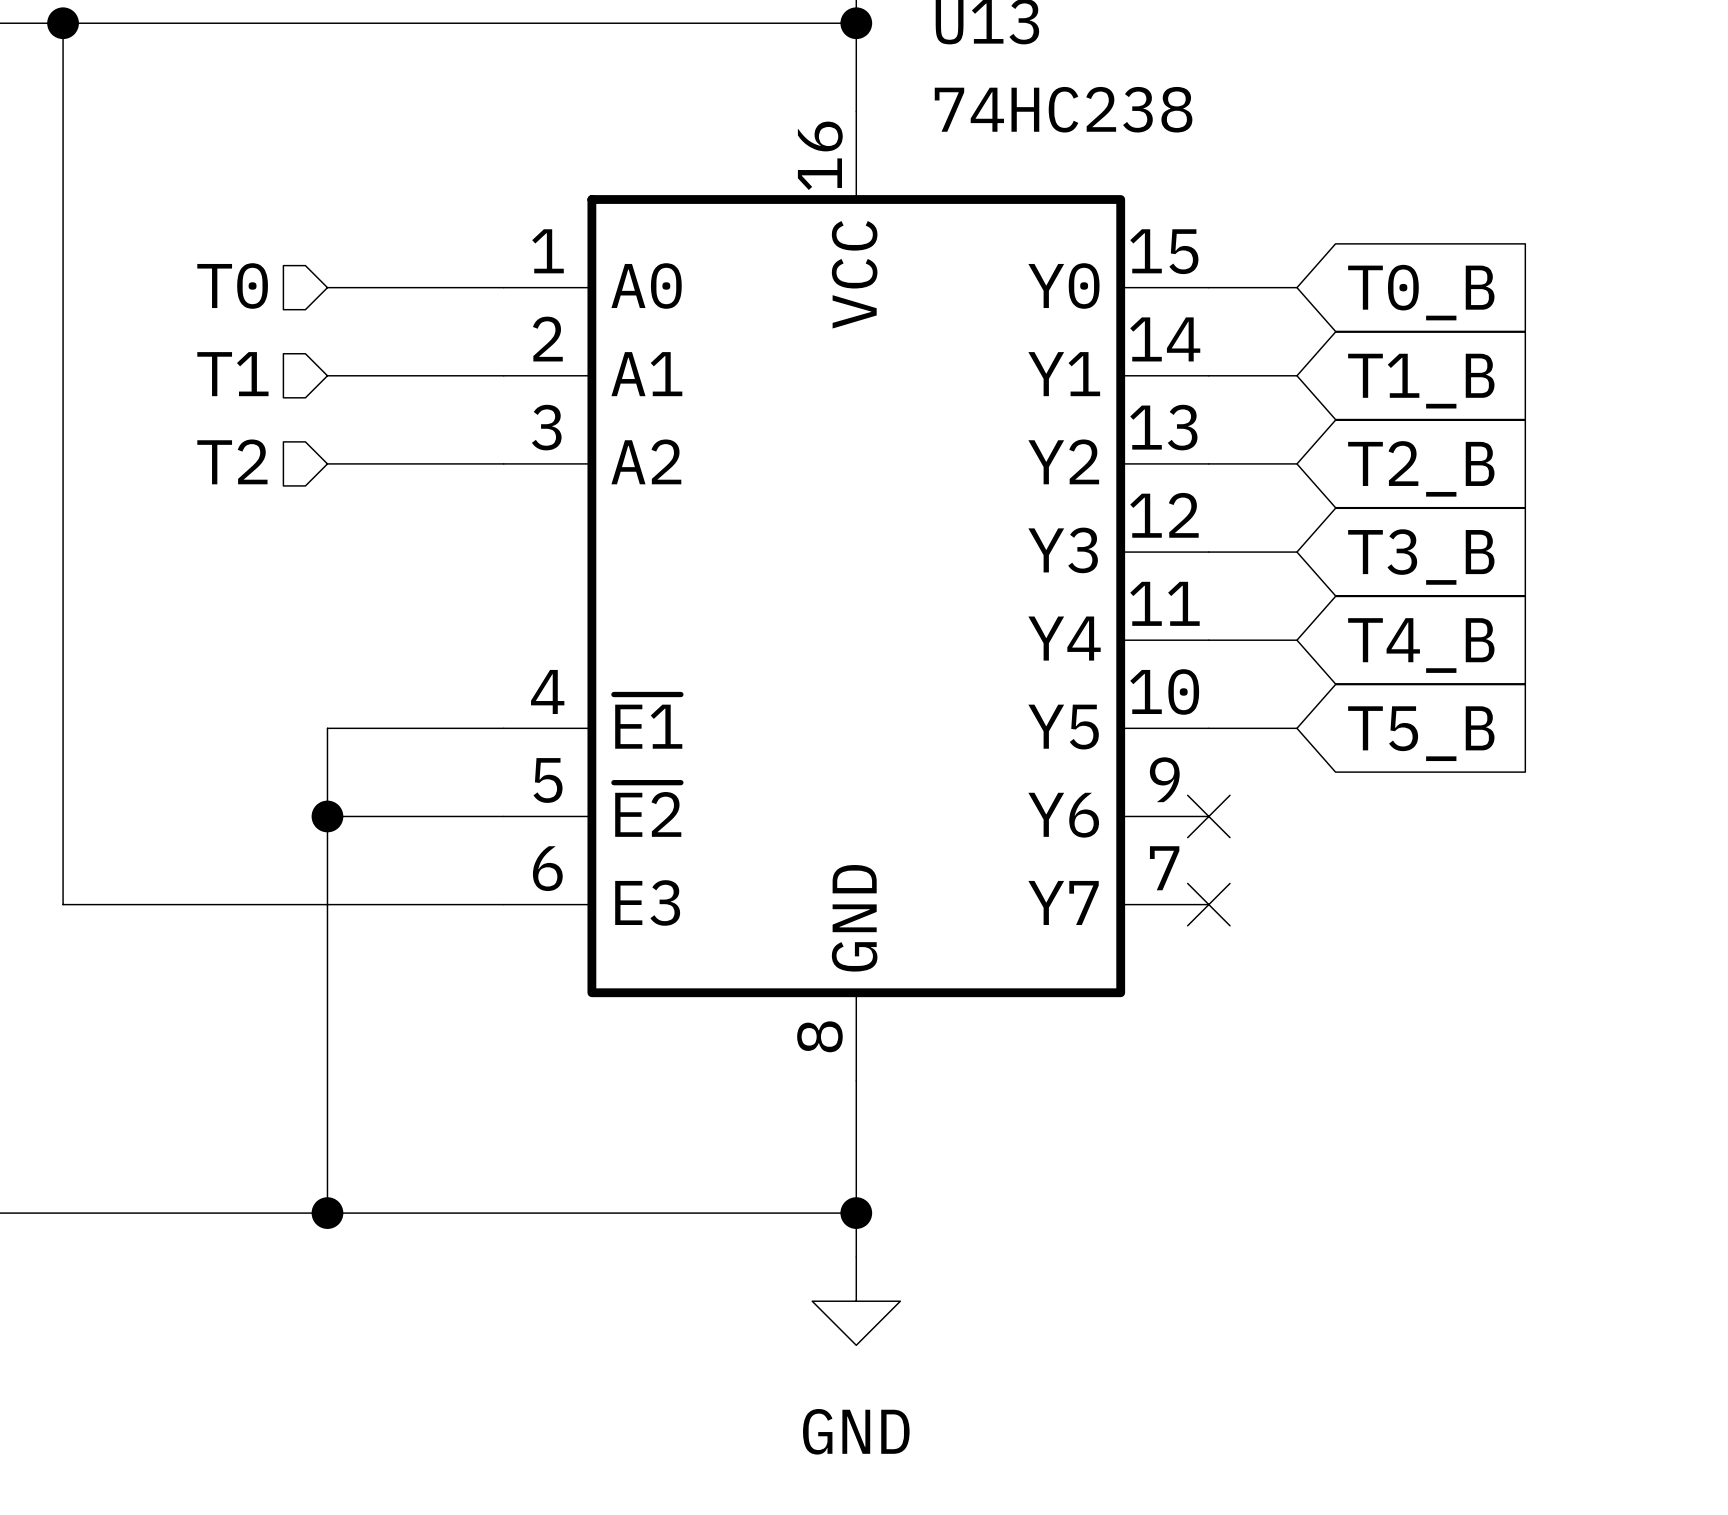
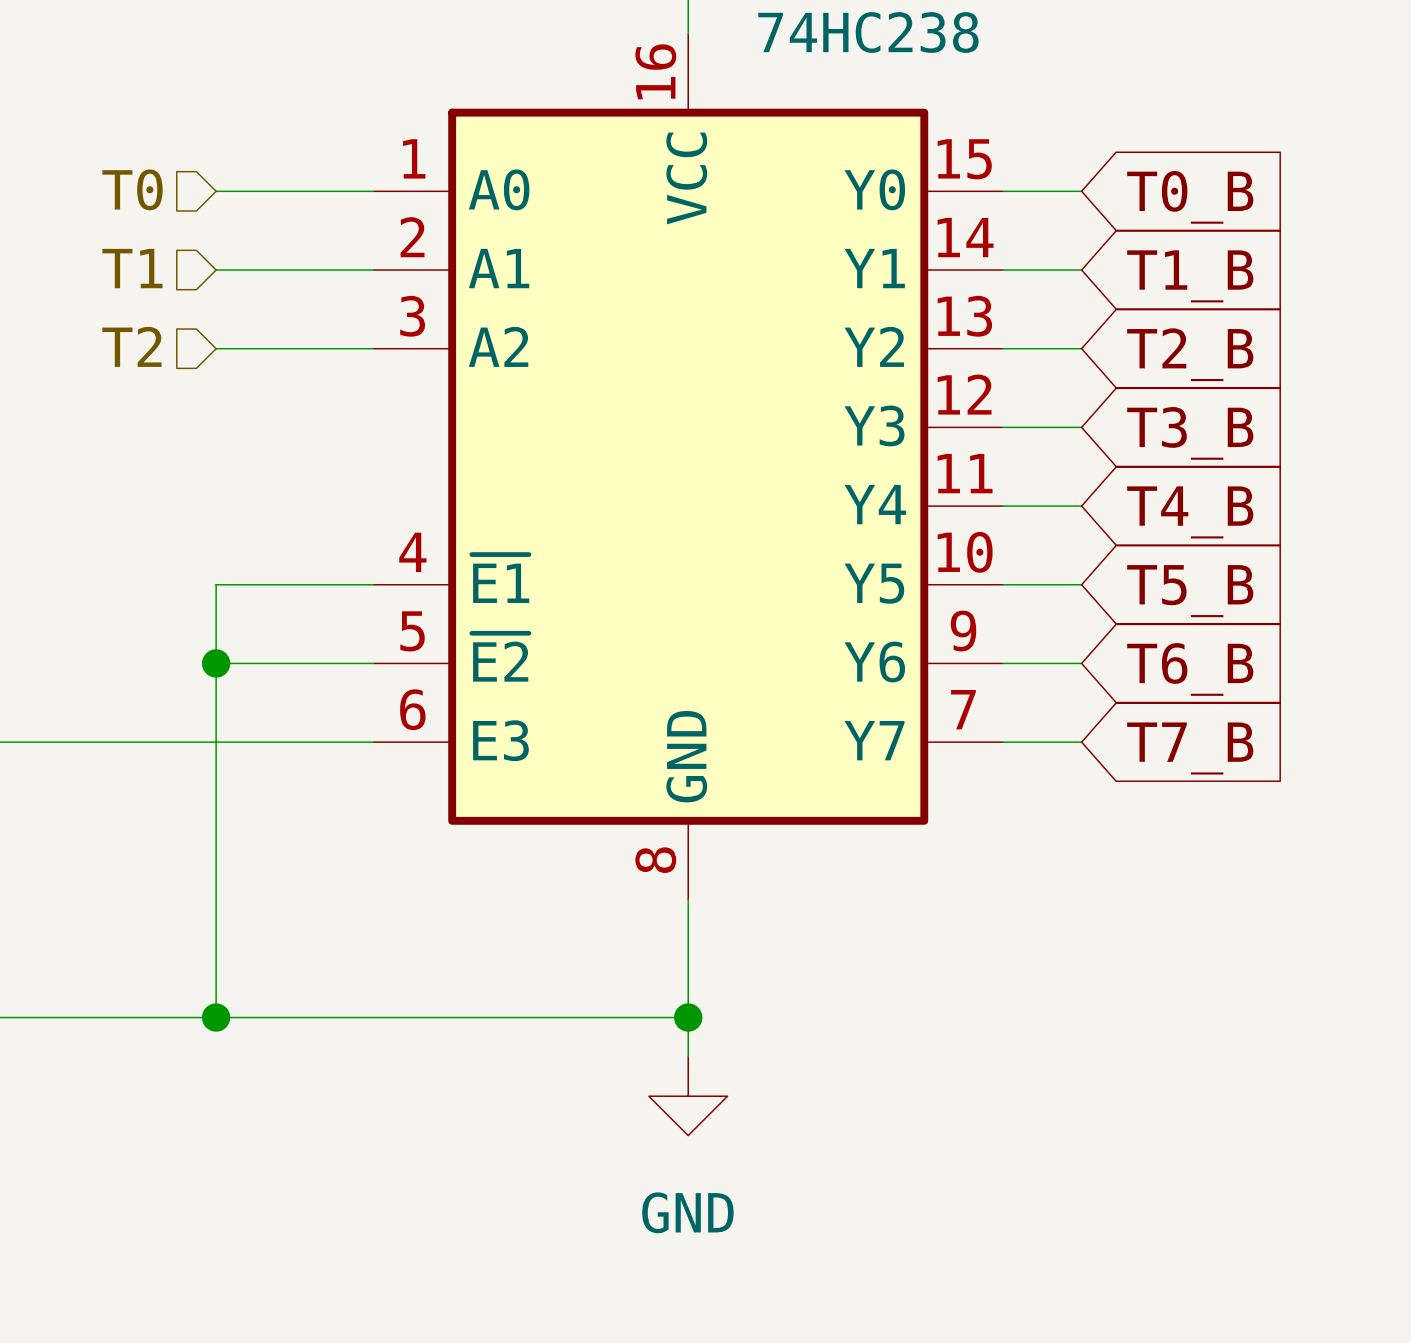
wire: none -> (1002, 663) (1081, 663)
no-connect mark: (1208, 816) -> none
global label: none -> T6_B (1190, 669)
wire: none -> (1002, 742) (1081, 742)
no-connect mark: (1208, 904) -> none
global label: none -> T7_B (1190, 748)

